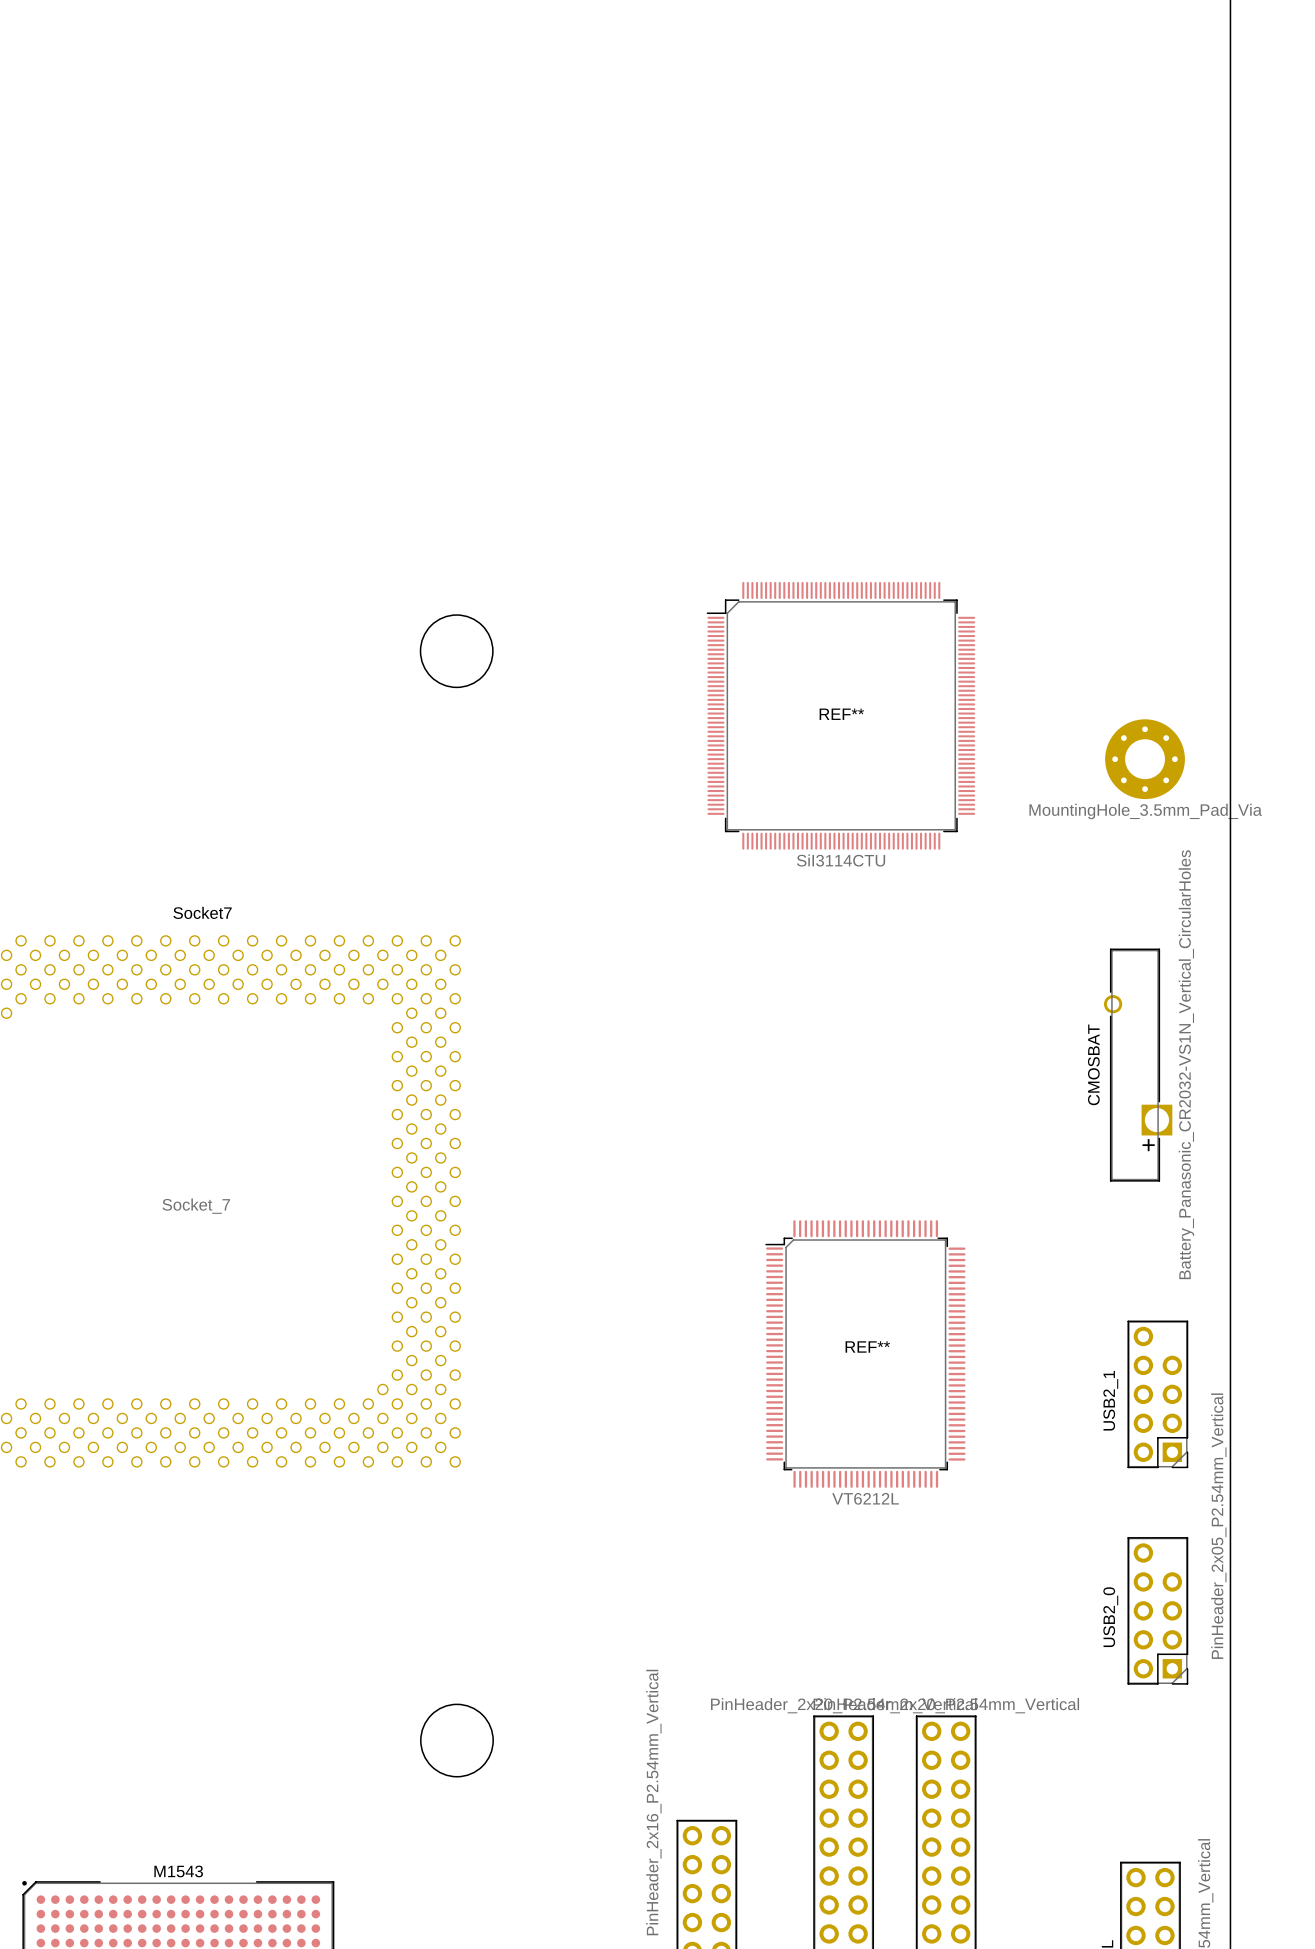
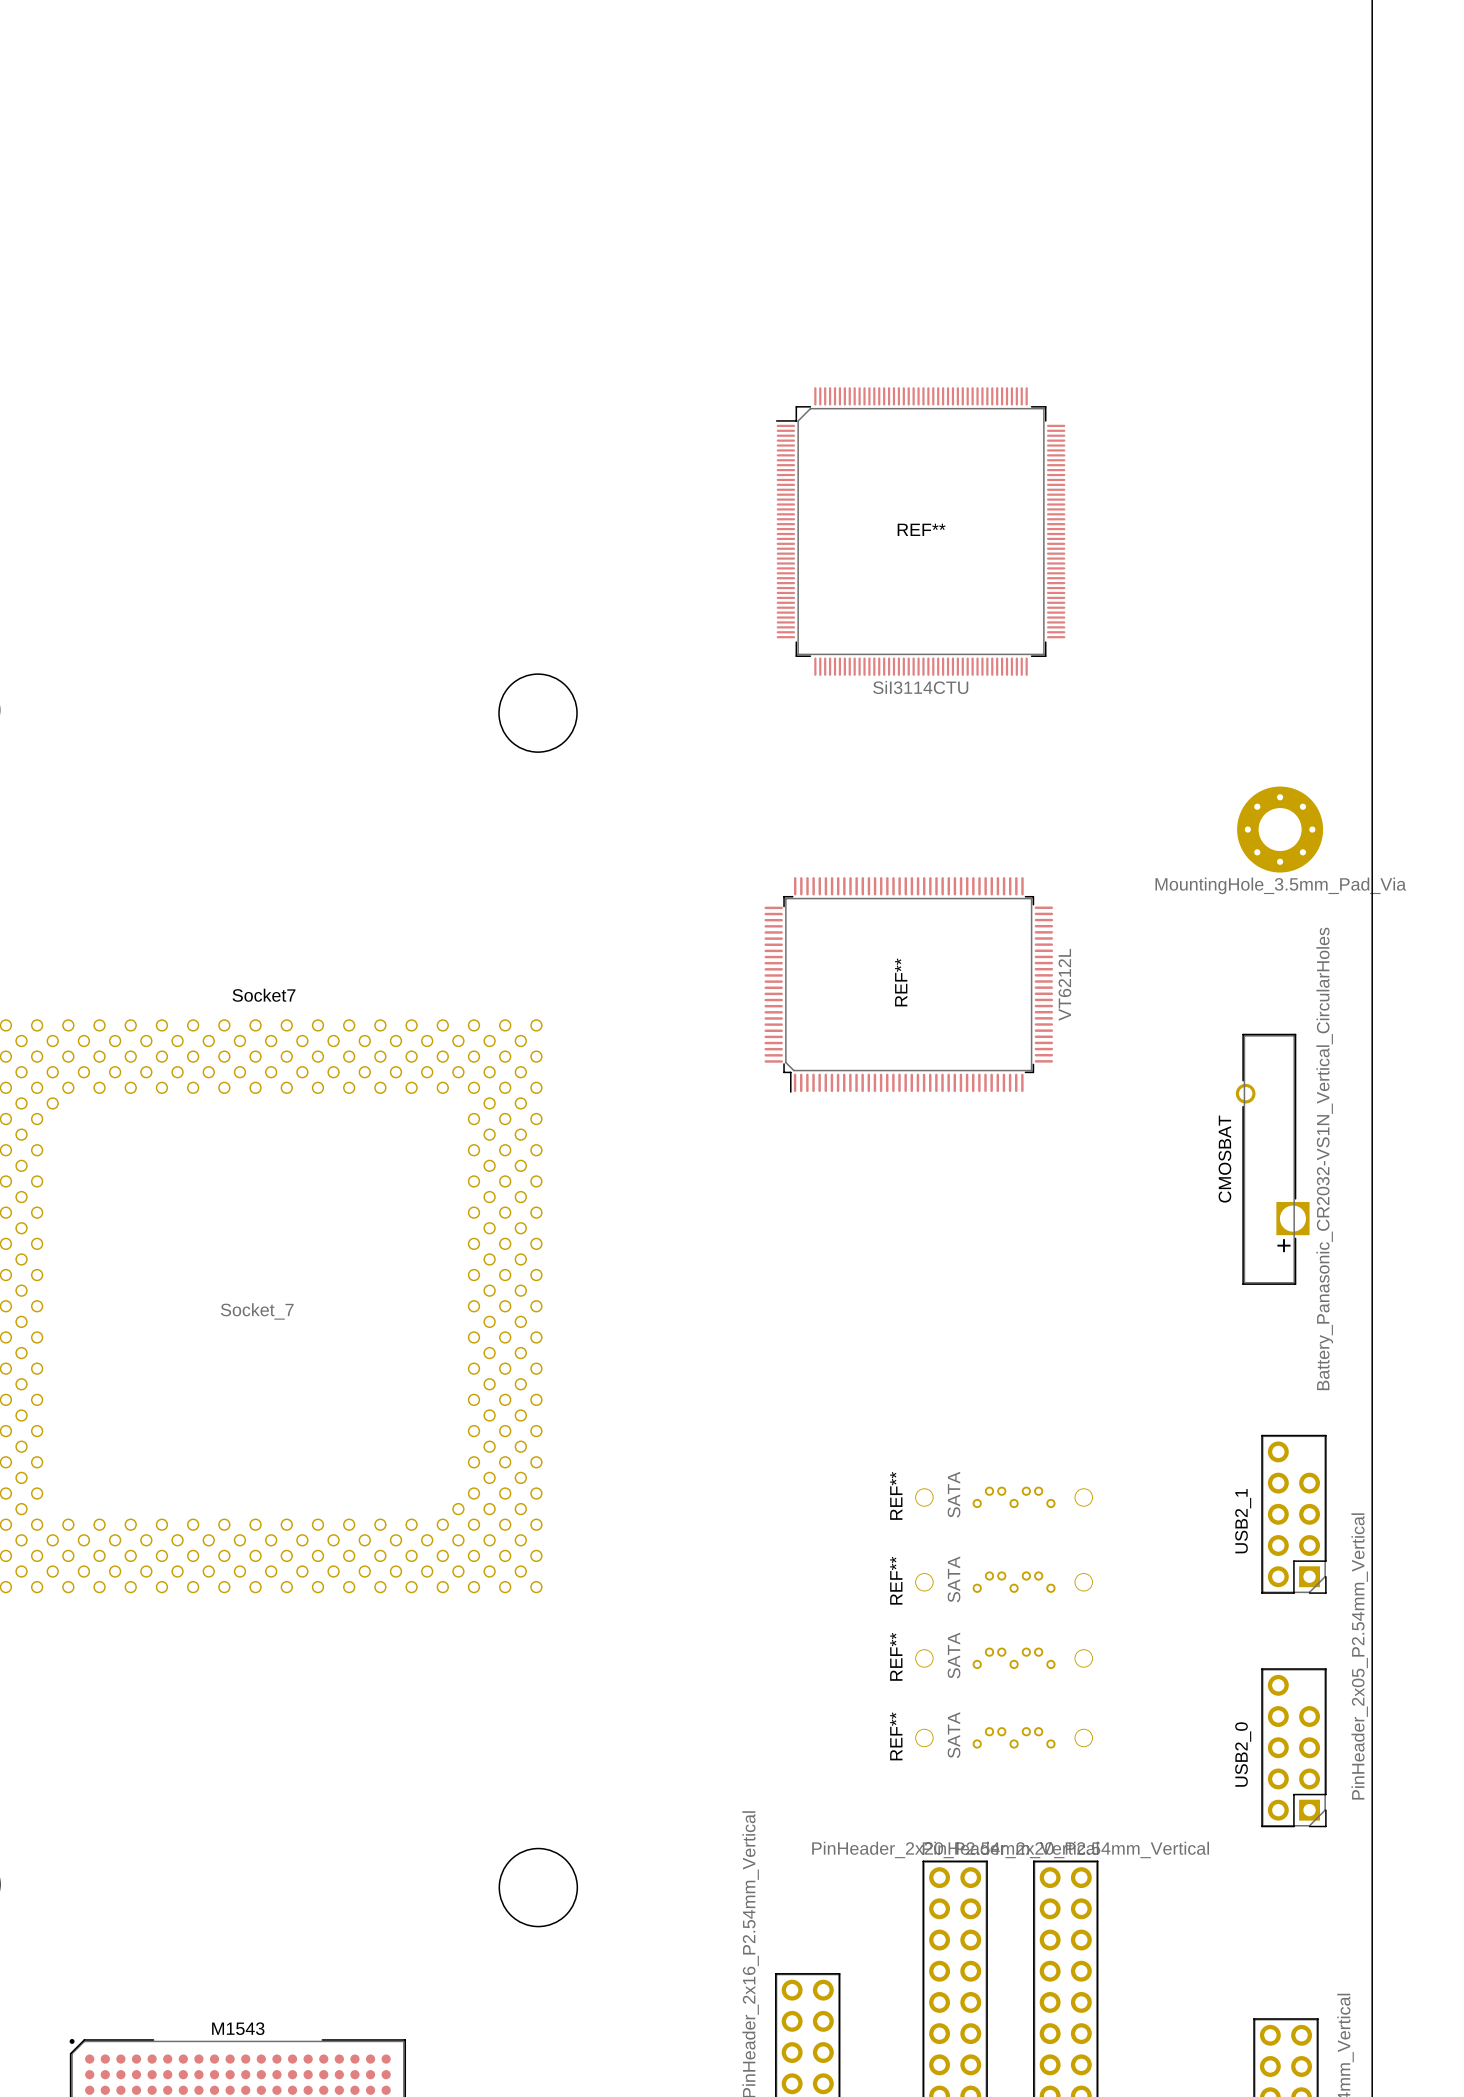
REF** position: (840, 715) -> (920, 531)
REF**: none -> VT6212L (908, 984)
REF**: VT6212L (865, 1354) -> none
REF**: none -> SATA (1004, 1497)
REF**: none -> SATA (1004, 1582)
REF**: none -> SATA (1004, 1658)
REF**: none -> SATA (1004, 1737)

